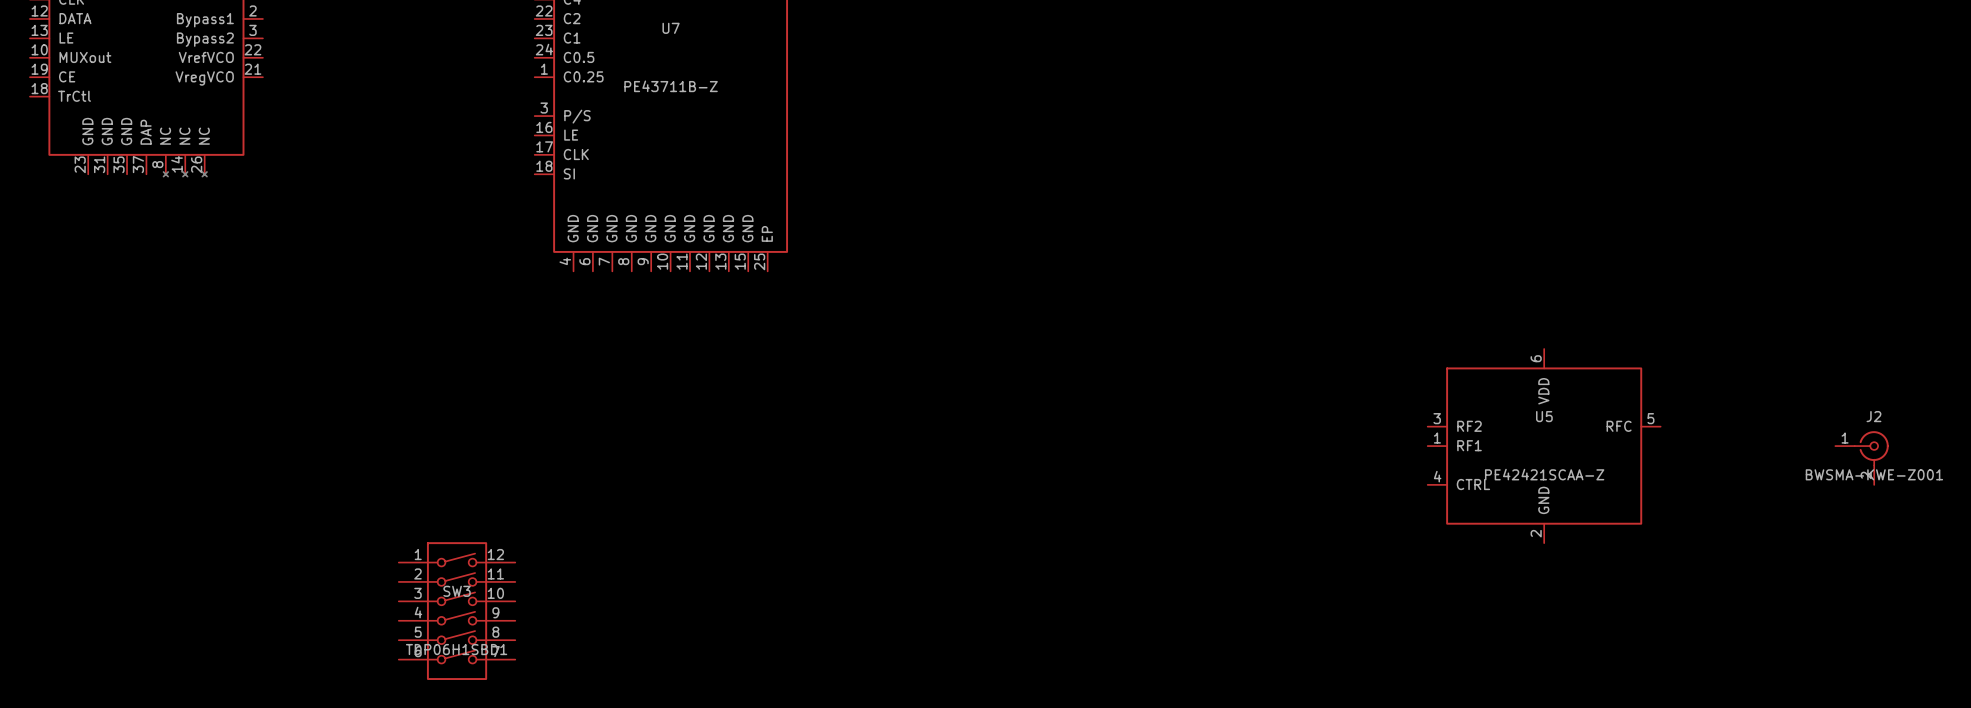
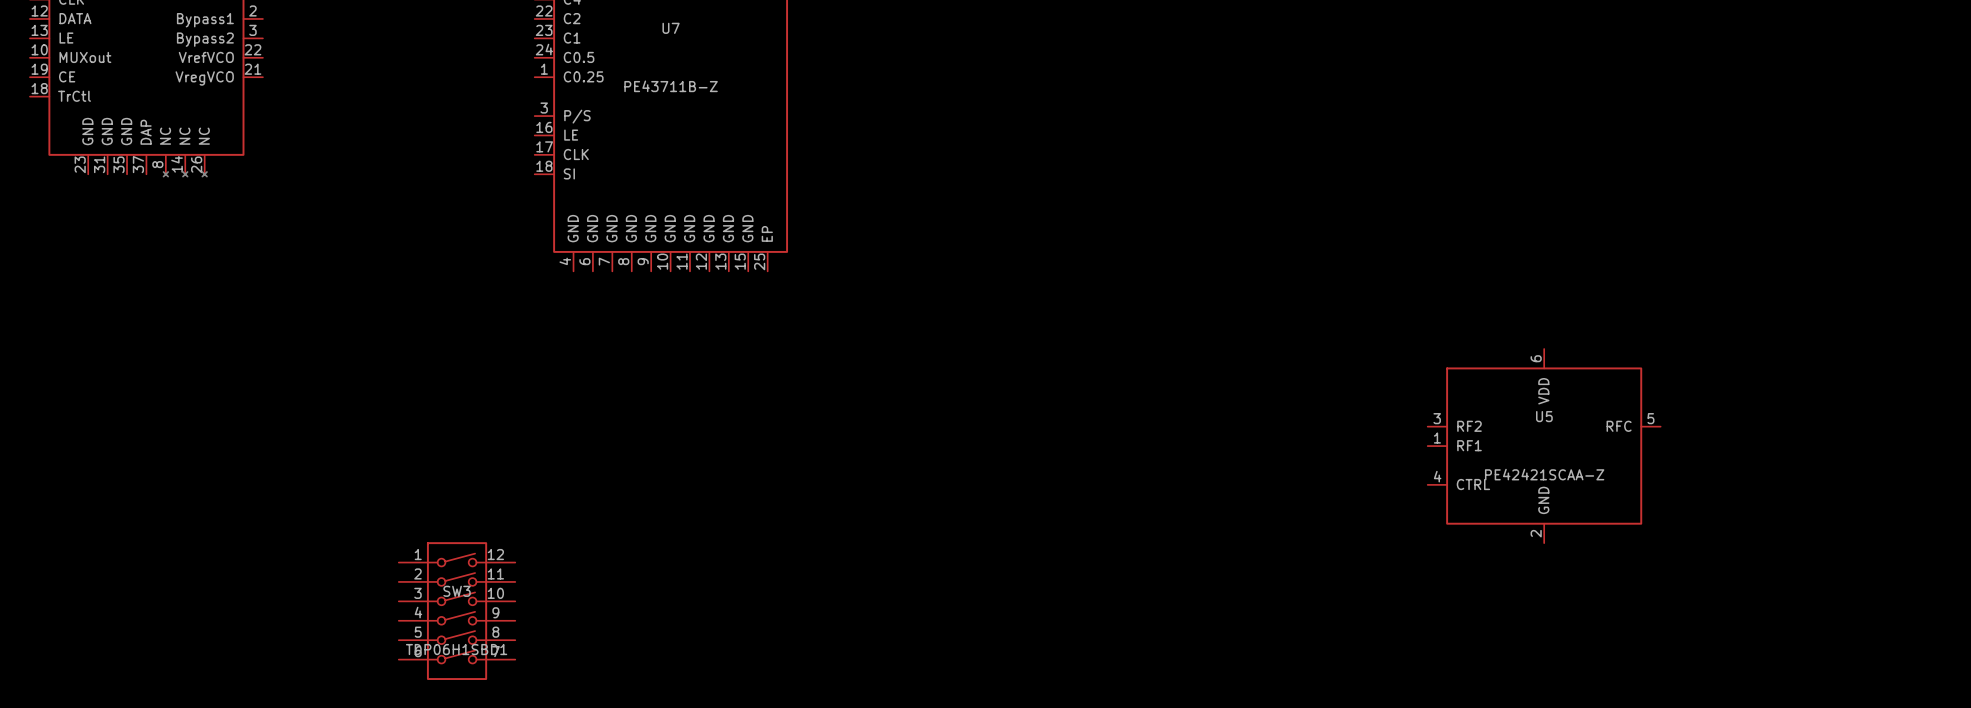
J2: BWSMA-KWE-Z001 (1862, 458) -> none

